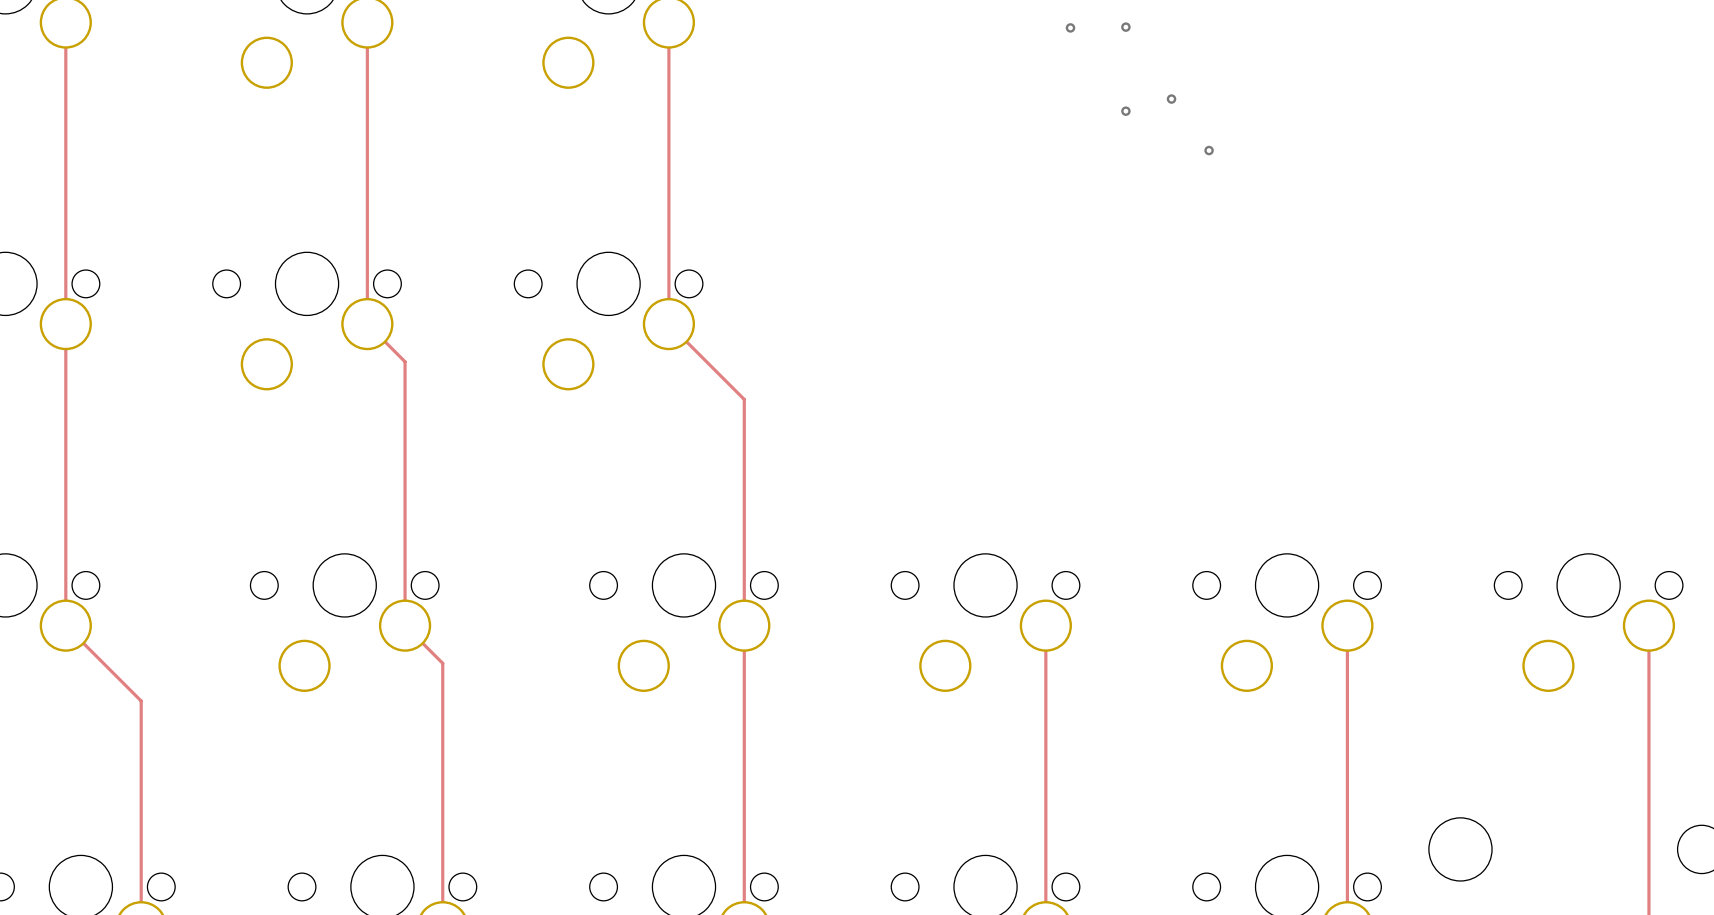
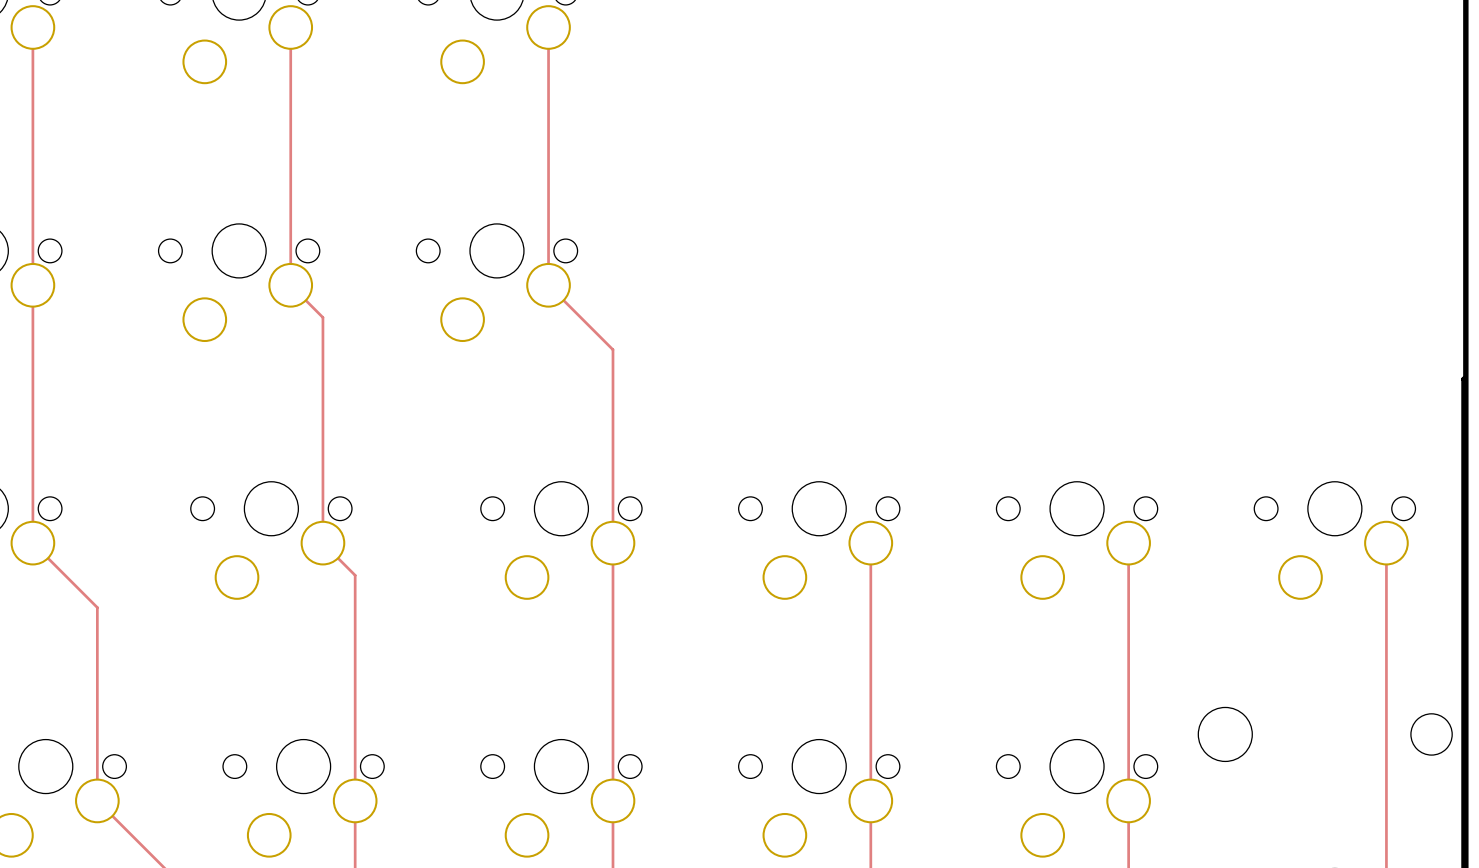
via: (1070, 27) -> none
via: (1125, 27) -> none
via: (1171, 99) -> none
via: (1125, 111) -> none
via: (1209, 150) -> none

